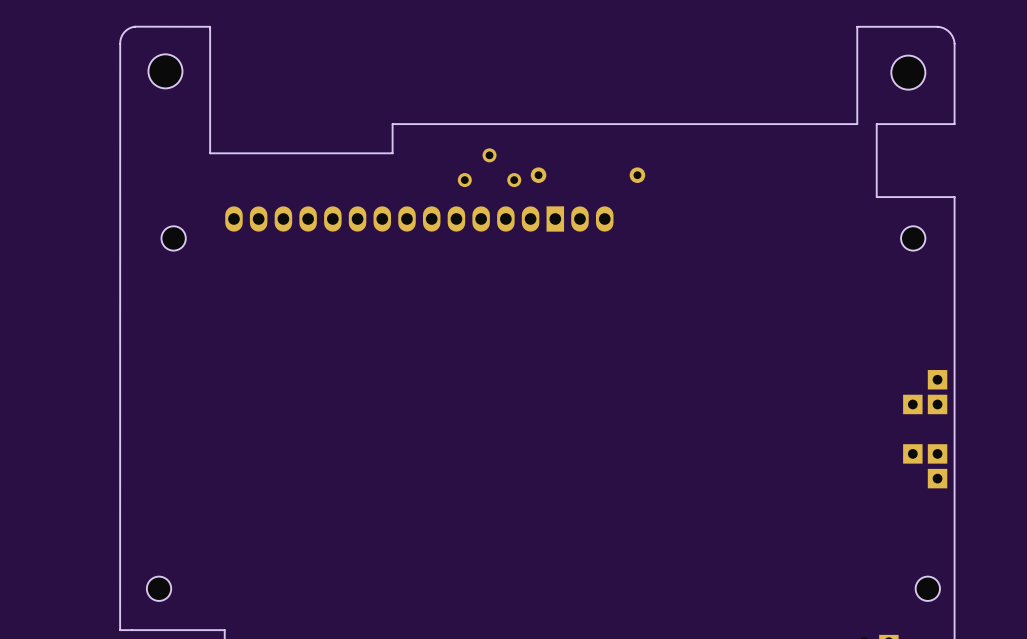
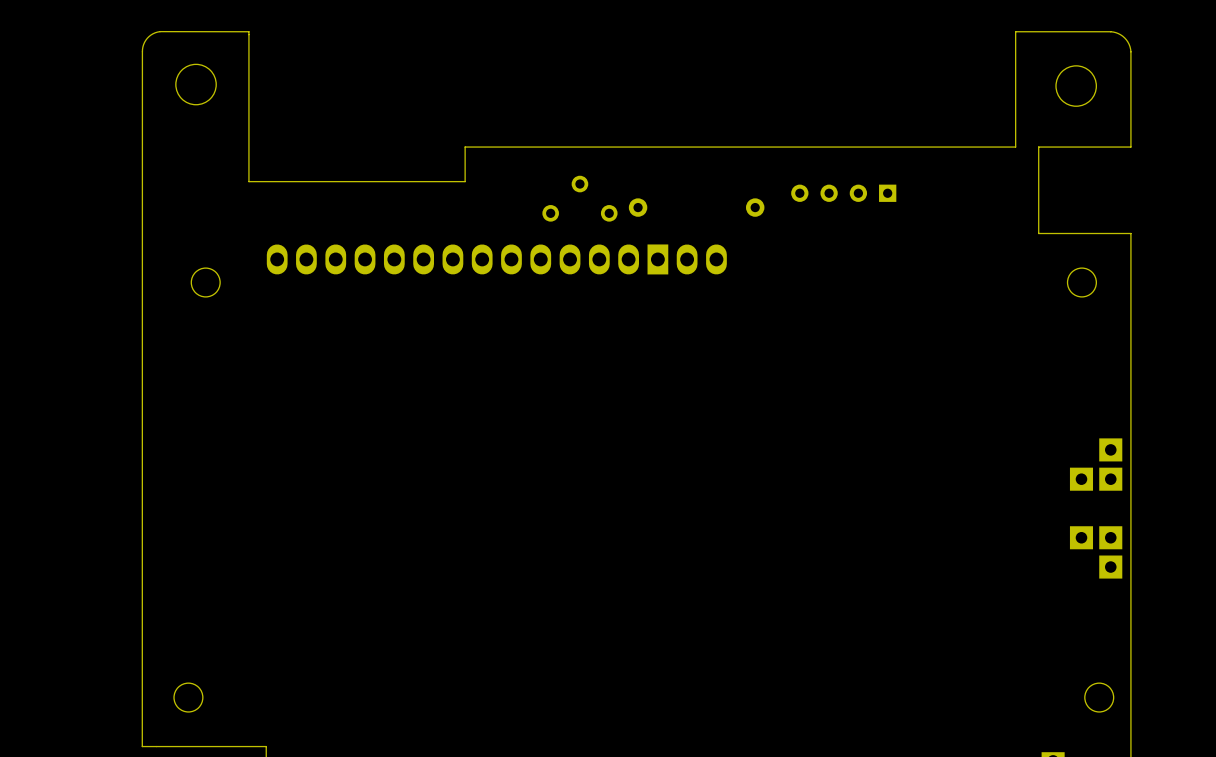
part: none -> (843, 193)

